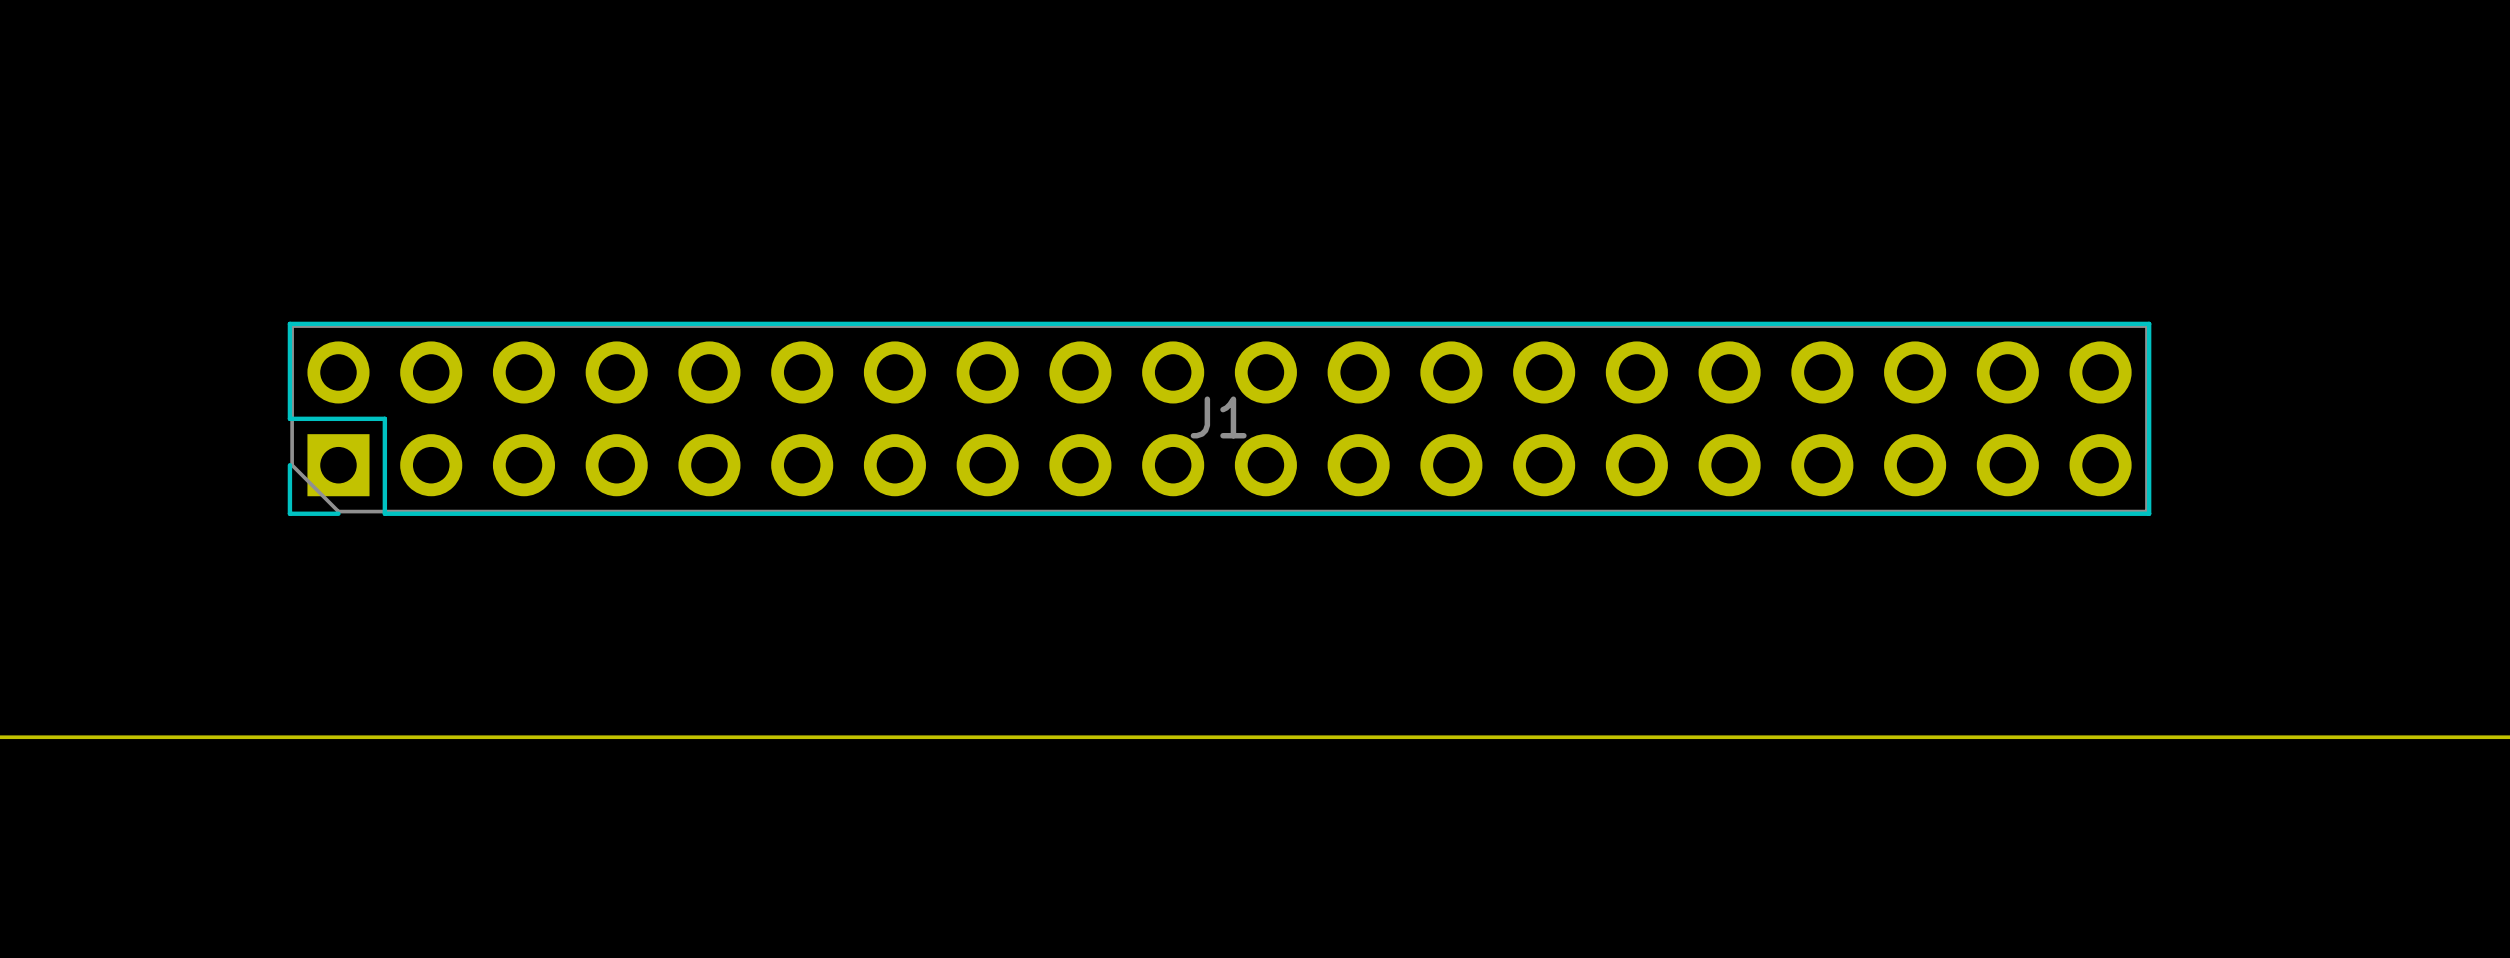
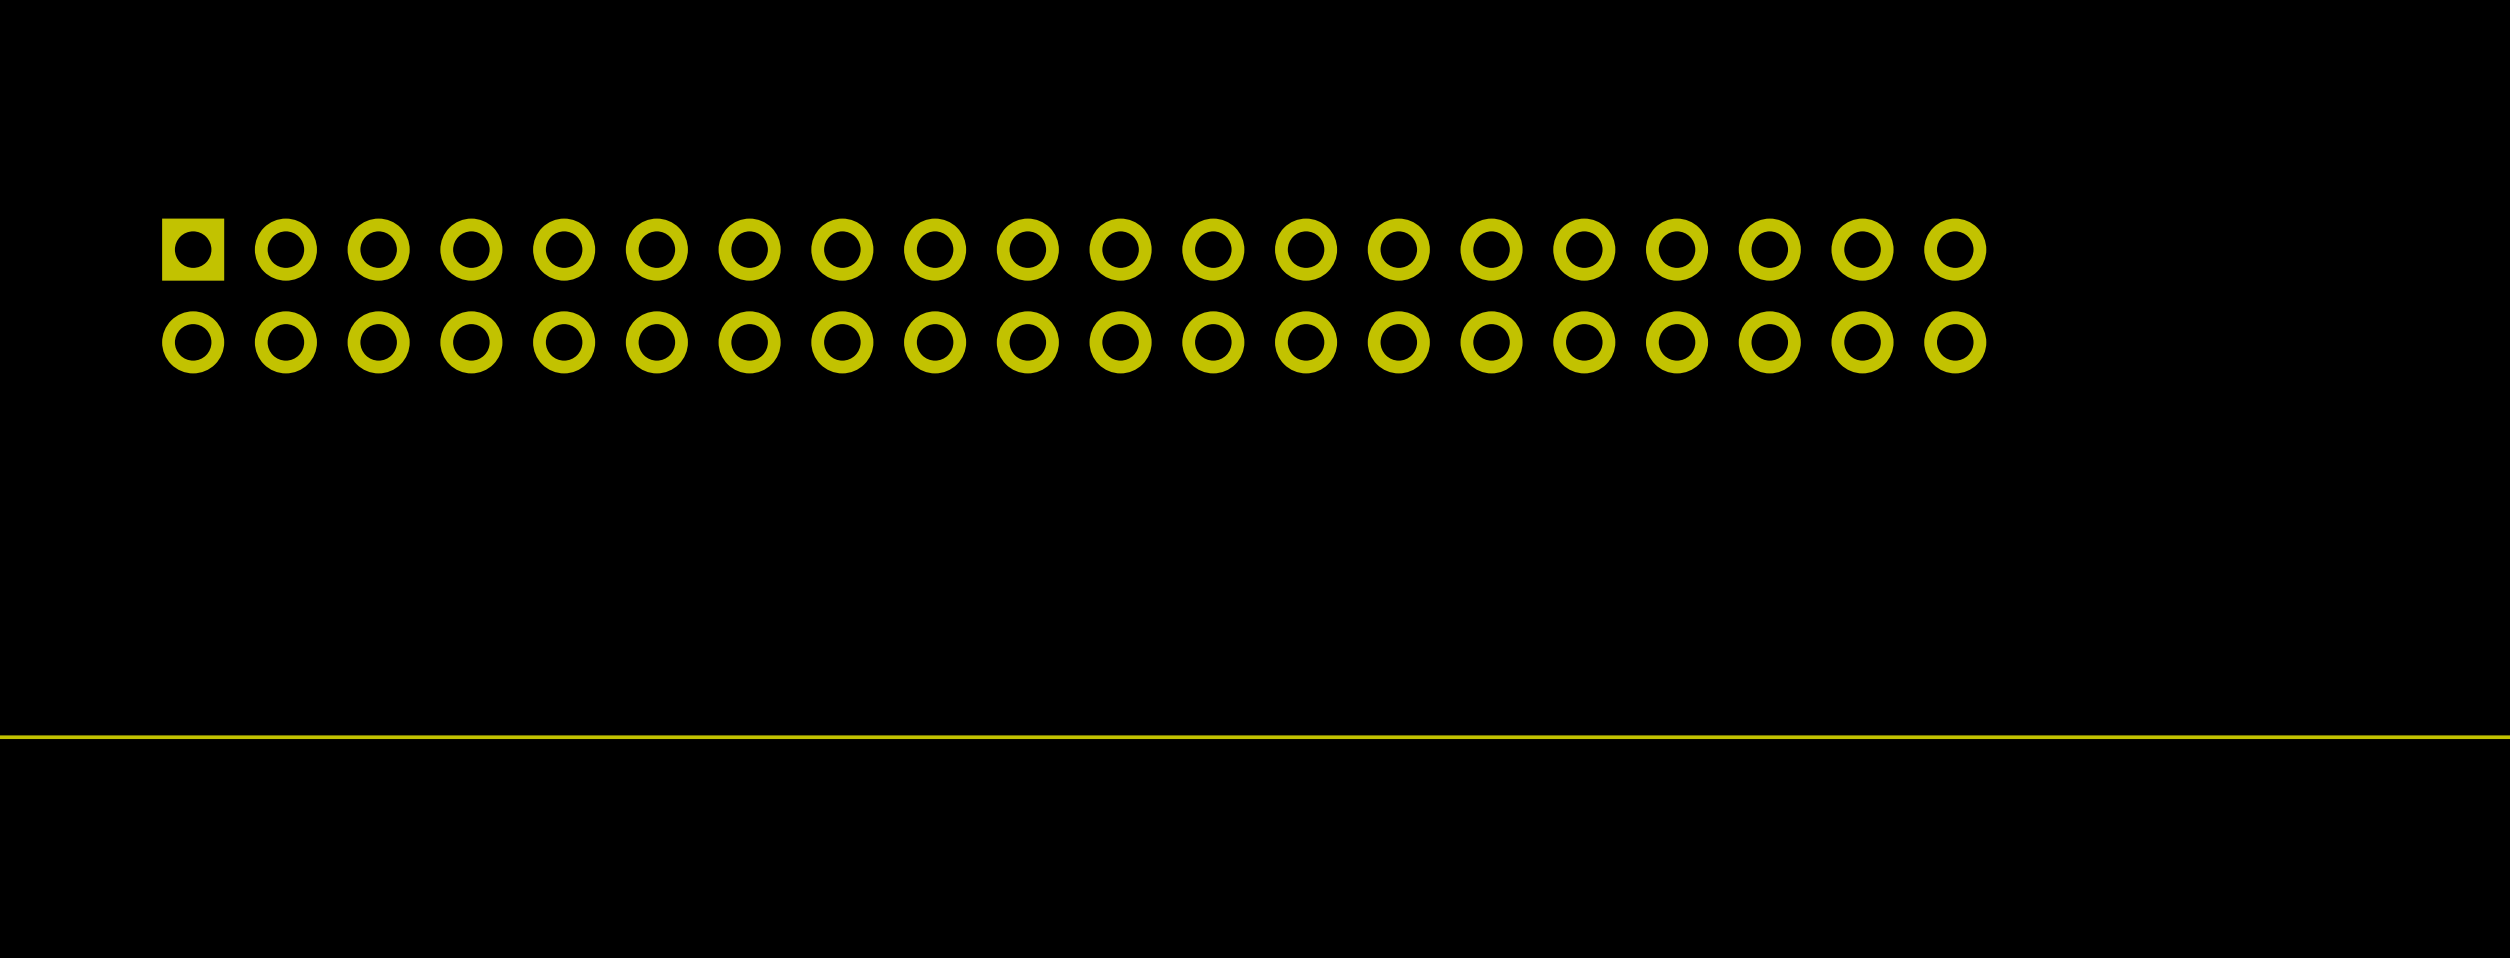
J1 side: bottom (1219, 418) -> top (1074, 296)

